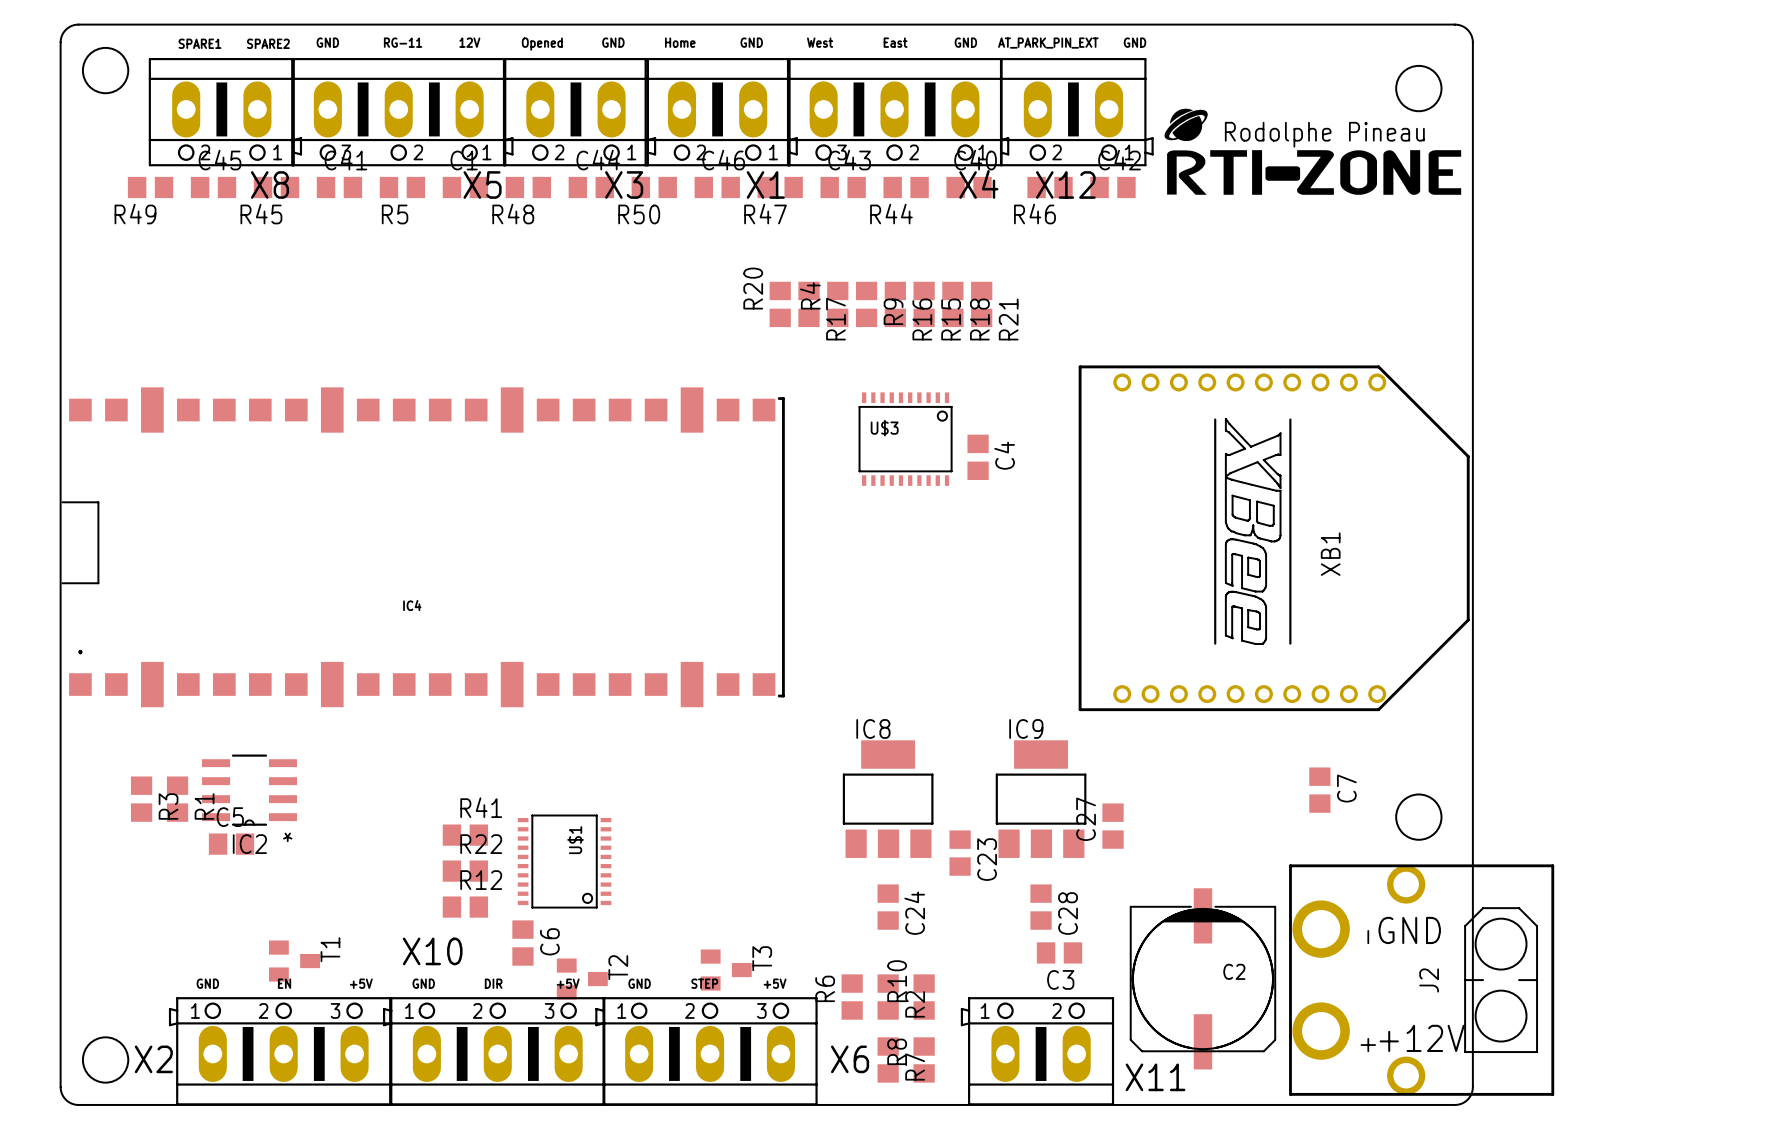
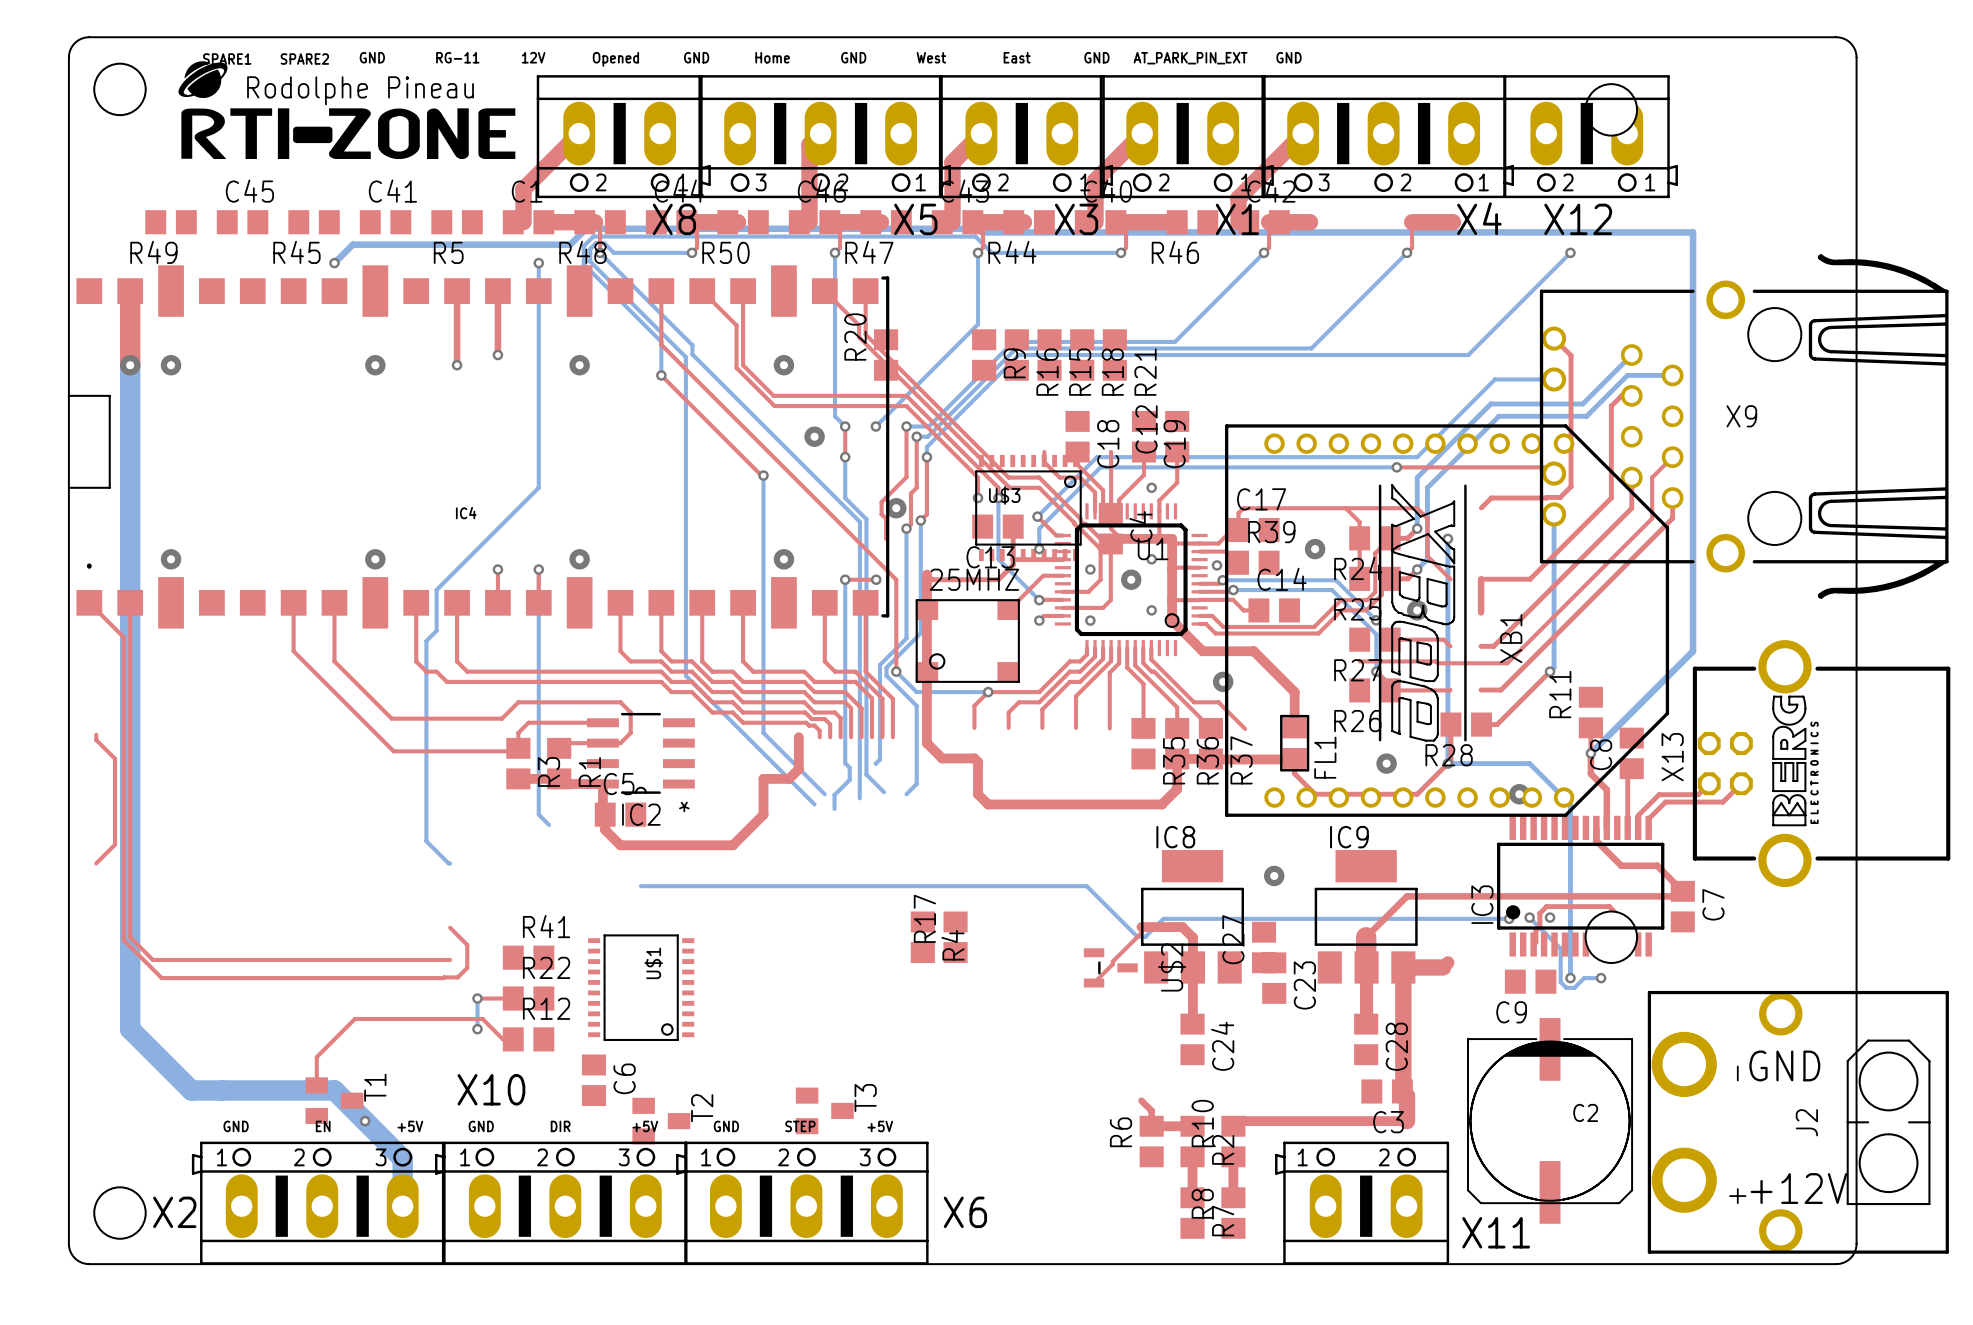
board edge: (1455, 24) (1467, 29) (1472, 42) (1472, 1087) (1467, 1099) (1455, 1104) -> (1652, 37) (1838, 37) (1850, 43) (1855, 49) (1856, 57) (1856, 1246) (1850, 1258) (1838, 1263) (1652, 1264)
drawing: none -> [178, 61, 516, 160]
drawing: [1164, 108, 1462, 195] -> none
top track: none -> (579, 133) (523, 189) (523, 222)
top track: none -> (820, 133) (809, 144) (809, 222)
top track: none -> (981, 133) (952, 162) (952, 222)
top track: none -> (1142, 133) (1095, 180) (1095, 222)
top track: none -> (1303, 133) (1238, 198) (1238, 222)
X8 position: (225, 112) -> (623, 136)
X5 position: (402, 112) -> (824, 136)
X3 position: (579, 112) -> (1025, 136)
X1 position: (721, 112) -> (1186, 136)
X4 position: (898, 112) -> (1387, 136)
X12 position: (1077, 112) -> (1590, 136)
top track: none -> (554, 222) (595, 222) (600, 227) (600, 252)
top track: none -> (738, 222) (697, 222) (697, 247) (692, 252)
top track: none -> (881, 222) (840, 222) (840, 247) (835, 252)
top track: none -> (1024, 222) (983, 222) (983, 247) (978, 252)
top track: none -> (1167, 222) (1126, 222) (1126, 247) (1121, 252)
top track: none -> (1310, 222) (1269, 222) (1269, 247) (1264, 252)
top track: none -> (1453, 222) (1412, 222) (1412, 247) (1407, 252)
bottom track: none -> (600, 252) (692, 345) (692, 354) (859, 521) (859, 798)
via: none -> (600, 252)
bottom track: none -> (692, 252) (613, 252) (604, 243) (596, 243) (590, 248) (590, 261) (685, 357) (685, 675) (814, 804)
via: none -> (692, 252)
bottom track: none -> (835, 252) (835, 416) (845, 426)
via: none -> (835, 252)
bottom track: none -> (978, 252) (978, 324) (875, 426)
via: none -> (978, 252)
bottom track: none -> (1121, 252) (991, 252) (975, 236) (593, 236) (583, 246) (583, 264) (661, 341) (661, 375)
via: none -> (1121, 252)
bottom track: none -> (1264, 252) (1174, 341) (1013, 341) (928, 426) (906, 426)
via: none -> (1264, 252)
bottom track: none -> (1407, 252) (1311, 348) (1016, 348) (927, 436) (916, 436)
via: none -> (1407, 252)
bottom track: none -> (1570, 252) (1468, 355) (1018, 355) (926, 446) (926, 457)
via: none -> (1570, 252)
bottom track: none -> (334, 263) (352, 244) (570, 244) (586, 228) (978, 228) (982, 232) (1693, 232) (1693, 651) (1590, 753)
via: none -> (334, 263)
bottom track: none -> (538, 263) (538, 487) (436, 589) (436, 630) (426, 641) (426, 841) (450, 863)
via: none -> (538, 263)
top track: none -> (130, 291) (130, 365)
top track: none -> (457, 291) (457, 365)
top track: none -> (497, 291) (497, 355)
top track: none -> (661, 291) (661, 344) (896, 579) (896, 671)
top track: none -> (702, 291) (736, 325) (736, 367) (774, 406) (906, 406) (978, 477) (978, 498)
top track: none -> (743, 291) (743, 365) (773, 395) (906, 395) (998, 487) (998, 498)
top track: none -> (824, 291) (859, 325) (859, 337) (1009, 487) (1039, 487) (1100, 549) (1100, 579) (1088, 591) (1062, 591)
top track: none -> (865, 291) (865, 334) (1008, 477) (1039, 477) (1110, 549) (1110, 600) (1103, 607) (1062, 607)
top track: none -> (1554, 338) (1571, 355) (1571, 486) (1560, 497) (1491, 498) (1481, 507)
R4 name position: R4 (810, 295) -> R4 (953, 945)
via: none -> (497, 355)
R17 position: (808, 304) -> (955, 937)
R4 position: (837, 304) -> (922, 937)
bottom track: none -> (1631, 355) (1582, 403) (1490, 403) (1417, 477) (1417, 528)
bottom track: none -> (130, 365) (130, 1029) (191, 1090) (334, 1090) (402, 1158) (402, 1206)
via: none -> (130, 365)
via: none -> (171, 365)
via: none -> (375, 365)
via: none -> (457, 365)
via: none -> (579, 365)
via: none -> (783, 365)
R17 name position: R17 (835, 319) -> R17 (924, 918)
top track: none -> (661, 375) (763, 475)
via: none -> (661, 375)
bottom track: none -> (1672, 375) (1627, 375) (1586, 416) (1498, 416) (1427, 487) (1427, 559) (1417, 569)
bottom track: none -> (1554, 379) (1494, 379) (1417, 457) (1097, 457) (1037, 516)
top track: none -> (1631, 395) (1621, 395) (1611, 406) (1611, 498) (1530, 579) (1481, 579) (1481, 612)
top track: none -> (845, 426) (845, 457)
via: none -> (845, 426)
via: none -> (875, 426)
top track: none -> (906, 426) (906, 477) (881, 502) (881, 514) (886, 518) (886, 538)
via: none -> (906, 426)
X9: none -> (1744, 426)
via: none -> (814, 436)
top track: none -> (916, 436) (916, 487) (911, 493) (911, 524) (906, 528)
via: none -> (916, 436)
C18: none -> (1077, 436)
C19: none -> (1144, 436)
C12: none -> (1177, 436)
top track: none -> (1044, 452) (1044, 462) (1059, 477) (1080, 477) (1095, 492) (1095, 511)
top track: none -> (1077, 452) (1077, 464) (1103, 490) (1103, 511)
top track: none -> (1110, 452) (1111, 528) (1121, 538) (1172, 538)
top track: none -> (1144, 452) (1144, 475) (1119, 499) (1119, 511)
top track: none -> (1177, 452) (1177, 482) (1159, 500) (1159, 536) (1161, 538)
bottom track: none -> (845, 457) (845, 498) (866, 519) (866, 774) (884, 792)
via: none -> (845, 457)
top track: none -> (926, 457) (926, 514) (920, 520)
via: none -> (926, 457)
top track: none -> (1672, 457) (1652, 477) (1652, 518) (1507, 663) (1359, 661)
top track: none -> (1396, 467) (1547, 467) (1554, 473)
bottom track: none -> (1396, 467) (1100, 467) (1039, 528) (1039, 549)
via: none -> (1396, 467)
bottom track: none -> (763, 475) (763, 732) (824, 794)
via: none -> (763, 475)
top track: none -> (1631, 477) (1631, 508) (1493, 646) (1481, 646)
via: none -> (1151, 487)
via: none -> (978, 498)
bottom track: none -> (998, 498) (998, 559) (1039, 600)
via: none -> (998, 498)
top track: none -> (1672, 498) (1672, 518) (1501, 690) (1481, 690)
via: none -> (896, 508)
top track: none -> (1345, 508) (1359, 522) (1359, 578)
bottom track: none -> (1554, 514) (1554, 667) (1550, 671)
top track: none -> (1037, 516) (1056, 535) (1062, 535)
via: none -> (1037, 516)
bottom track: none -> (920, 520) (920, 633) (886, 667) (886, 675) (916, 705) (916, 784) (906, 794)
via: none -> (920, 520)
C13: none -> (997, 526)
top track: none -> (1013, 526) (1013, 564) (998, 579) (932, 579) (926, 574) (926, 743) (942, 758) (974, 758) (978, 762) (978, 794) (988, 804) (1161, 804) (1177, 789) (1177, 758) (1293, 759)
bottom track: none -> (906, 528) (906, 638) (879, 664) (879, 759) (876, 763)
via: none -> (906, 528)
top track: none -> (1417, 528) (1407, 538) (1390, 538) (1375, 553) (1375, 592) (1367, 600) (1340, 600) (1314, 626) (1223, 626) (1212, 615) (1199, 615)
via: none -> (1417, 528)
C17: none -> (1253, 530)
R24: none -> (1374, 538)
top track: none -> (1172, 538) (1172, 620) (1202, 651) (1253, 651) (1294, 692) (1294, 727)
top track: none -> (1172, 538) (1176, 543) (1218, 543) (1232, 530) (1238, 530) (1238, 513) (1243, 508) (1417, 508) (1427, 518) (1427, 556) (1450, 579)
bottom track: none -> (1447, 538) (1447, 763) (1529, 763) (1570, 804) (1570, 978)
via: none -> (1447, 538)
via: none -> (1039, 549)
via: none -> (1315, 549)
top track: none -> (1199, 551) (1225, 551) (1238, 562)
via: none -> (171, 559)
via: none -> (375, 559)
via: none -> (579, 559)
via: none -> (783, 559)
top track: none -> (1013, 559) (1062, 559)
via: none -> (1151, 559)
R39: none -> (1253, 562)
via: none -> (1217, 565)
top track: none -> (1199, 567) (1173, 567) (1172, 569)
top track: none -> (497, 569) (497, 602)
via: none -> (497, 569)
top track: none -> (538, 569) (538, 602)
bottom track: none -> (538, 569) (538, 814) (548, 824)
via: none -> (538, 569)
via: none -> (1090, 569)
top track: none -> (1417, 569) (1407, 578) (1388, 578) (1381, 585) (1381, 594) (1366, 610) (1341, 610) (1318, 633) (1215, 633) (1206, 623) (1199, 623)
via: none -> (1417, 569)
top track: none -> (1062, 575) (1043, 575) (1008, 610)
R25: none -> (1374, 578)
top track: none -> (845, 579) (876, 579)
bottom track: none -> (845, 579) (845, 763) (849, 767) (849, 779) (834, 795) (834, 808)
via: none -> (845, 579)
via: none -> (876, 579)
U1: none -> (1131, 579)
via: none -> (1131, 579)
bottom track: none -> (1222, 580) (1336, 580) (1376, 620)
via: none -> (1222, 580)
top track: none -> (1223, 579) (1219, 583) (1199, 583)
top track: none -> (1233, 589) (1231, 591) (1199, 591)
bottom track: none -> (1233, 590) (1332, 590) (1376, 634) (1376, 671)
via: none -> (1233, 590)
via: none -> (1039, 600)
top track: none -> (1062, 599) (1039, 600)
top track: none -> (1172, 600) (1233, 599) (1243, 610) (1258, 610)
top track: none -> (89, 602) (123, 637) (123, 939) (161, 978) (457, 977) (467, 967) (467, 944) (450, 927)
top track: none -> (130, 602) (130, 937) (152, 959) (450, 959)
top track: none -> (293, 602) (293, 651) (393, 751) (515, 751) (518, 748) (518, 732) (528, 722) (602, 722)
top track: none -> (334, 602) (334, 661) (391, 718) (502, 718) (518, 702) (620, 702) (630, 712) (630, 732) (620, 743) (564, 743) (559, 748)
top track: none -> (416, 602) (416, 661) (426, 671) (436, 671) (446, 681) (661, 681) (671, 692) (692, 692) (712, 712) (732, 712) (743, 722) (806, 722) (809, 725) (814, 725) (819, 730) (819, 737)
top track: none -> (457, 602) (457, 661) (467, 671) (661, 671) (671, 681) (692, 681) (712, 702) (732, 702) (743, 712) (805, 712) (811, 719) (824, 719) (830, 724) (830, 737)
top track: none -> (620, 602) (620, 651) (630, 661) (661, 661) (671, 671) (692, 671) (712, 692) (732, 692) (743, 702) (804, 702) (814, 712) (835, 712) (840, 718) (840, 737)
top track: none -> (661, 602) (661, 651) (671, 661) (692, 661) (712, 681) (732, 681) (743, 692) (804, 692) (814, 702) (845, 702) (851, 708) (851, 737)
top track: none -> (702, 602) (702, 661) (712, 671) (732, 671) (743, 681) (804, 681) (814, 692) (845, 692) (861, 708) (861, 737)
top track: none -> (743, 602) (743, 661) (753, 671) (804, 671) (814, 681) (855, 681) (872, 698) (872, 737)
top track: none -> (824, 602) (824, 661) (835, 671) (855, 671) (882, 698) (882, 737)
top track: none -> (865, 602) (865, 671) (892, 698) (892, 737)
via: none -> (1151, 610)
C14: none -> (1274, 610)
via: none -> (1417, 610)
top track: none -> (1062, 615) (1043, 615) (1039, 620)
via: none -> (1039, 620)
via: none -> (1090, 620)
via: none -> (1376, 620)
IC4 position: (423, 547) -> (478, 446)
R27: none -> (1374, 639)
top track: none -> (1390, 639) (1443, 639) (1450, 646)
25MHZ: none -> (967, 641)
top track: none -> (1086, 648) (1086, 654) (1080, 661) (1069, 661) (1039, 692) (988, 692) (974, 705) (974, 727)
top track: none -> (1095, 648) (1095, 656) (1080, 671) (1069, 671) (1039, 702) (1018, 702) (1008, 712) (1008, 727)
top track: none -> (1103, 648) (1103, 658) (1080, 681) (1069, 681) (1042, 709) (1042, 727)
top track: none -> (1111, 648) (1111, 661) (1076, 696) (1076, 727)
top track: none -> (1119, 648) (1119, 663) (1109, 672) (1109, 728)
top track: none -> (1127, 648) (1127, 667) (1143, 683) (1143, 728)
top track: none -> (1135, 648) (1135, 665) (1177, 707) (1177, 728)
top track: none -> (1143, 648) (1143, 663) (1151, 671) (1154, 671) (1210, 728)
top track: none -> (1151, 648) (1151, 659) (1194, 702) (1218, 702) (1245, 728)
bottom track: none -> (896, 671) (916, 692) (988, 692)
via: none -> (896, 671)
top track: none -> (1376, 671) (1390, 685) (1390, 690) (1450, 690)
via: none -> (1376, 671)
top track: none -> (1550, 671) (1497, 724) (1481, 724)
via: none -> (1550, 671)
via: none -> (1223, 681)
R26: none -> (1374, 690)
via: none -> (988, 692)
R11: none -> (1590, 712)
top track: none -> (1450, 724) (1450, 760) (1417, 794) (1315, 794) (1294, 773) (1293, 759)
R28: none -> (1466, 724)
top track: none -> (1590, 727) (1590, 773) (1606, 789) (1606, 827)
top track: none -> (96, 734) (96, 740) (115, 758) (115, 844) (96, 863)
top track: none -> (798, 737) (798, 769) (789, 778) (763, 778) (763, 814) (732, 845) (620, 845) (605, 830) (602, 784) (564, 784) (559, 778) (518, 778)
R35: none -> (1143, 743)
R36: none -> (1177, 743)
R37: none -> (1210, 743)
FL1: none -> (1294, 743)
via: none -> (1590, 753)
C8: none -> (1631, 753)
via: none -> (1386, 763)
via: none -> (1447, 763)
X13: none -> (1821, 763)
top track: none -> (1631, 768) (1627, 772) (1627, 827)
top track: none -> (1709, 783) (1698, 794) (1659, 794) (1638, 815) (1638, 827)
top track: none -> (1741, 783) (1723, 802) (1665, 802) (1648, 819) (1648, 827)
via: none -> (1519, 794)
top track: none -> (1596, 827) (1596, 840) (1621, 865) (1657, 865) (1682, 891) (1677, 896) (1407, 896) (1366, 937) (1366, 1024)
via: none -> (1274, 875)
bottom track: none -> (640, 886) (1086, 886) (1137, 936) (1145, 936) (1163, 918) (1509, 918)
IC3: none -> (1580, 886)
IC2 position: (249, 790) -> (640, 753)
C7 position: (1319, 790) -> (1682, 906)
R3 position: (141, 799) -> (518, 763)
R1 position: (177, 799) -> (559, 763)
IC8 position: (888, 799) -> (1192, 916)
IC9 position: (1041, 799) -> (1366, 916)
bottom track: none -> (1529, 917) (1560, 948) (1560, 982) (1566, 987) (1574, 987) (1584, 978) (1601, 978)
via: none -> (1529, 917)
via: none -> (1550, 917)
via: none -> (1509, 918)
top track: none -> (1617, 944) (1617, 914) (1609, 906) (1546, 906) (1539, 913) (1539, 926) (1535, 930) (1535, 942) (1533, 944)
top track: none -> (1447, 962) (1443, 967) (1403, 967) (1403, 1092) (1407, 1096)
C5 position: (231, 844) -> (620, 814)
U$2: none -> (1110, 967)
C23 position: (960, 853) -> (1274, 978)
via: none -> (1570, 978)
via: none -> (1601, 978)
C9: none -> (1530, 981)
top track: none -> (1094, 983) (1141, 932) (1141, 927) (1182, 927) (1192, 937) (1192, 1024)
top track: none -> (477, 998) (513, 998)
bottom track: none -> (477, 998) (477, 1029)
via: none -> (477, 998)
via: none -> (477, 1029)
top track: none -> (513, 1039) (503, 1039) (482, 1018) (354, 1018) (316, 1057) (316, 1085)
C24 position: (888, 907) -> (1192, 1039)
C28 position: (1041, 907) -> (1366, 1039)
text position: GND (1409, 930) -> GND (1784, 1065)
C3 position: (1059, 952) -> (1387, 1091)
top track: none -> (1407, 1096) (1407, 1121) (1238, 1121) (1233, 1126)
top track: none -> (1141, 1100) (1151, 1110) (1151, 1126) (1192, 1126)
C2 position: (1202, 978) -> (1550, 1120)
via: none -> (365, 1121)
J2 position: (1421, 980) -> (1798, 1122)
R6 position: (852, 997) -> (1151, 1141)
R2 position: (888, 997) -> (1192, 1141)
R10 position: (924, 997) -> (1233, 1141)
top track: none -> (1192, 1156) (1192, 1197)
top track: none -> (1233, 1156) (1233, 1197)
text position: +12V (1422, 1038) -> +12V (1798, 1188)
X11 position: (1037, 1051) -> (1362, 1203)
R7 position: (888, 1059) -> (1192, 1213)
R8 position: (924, 1059) -> (1233, 1213)

